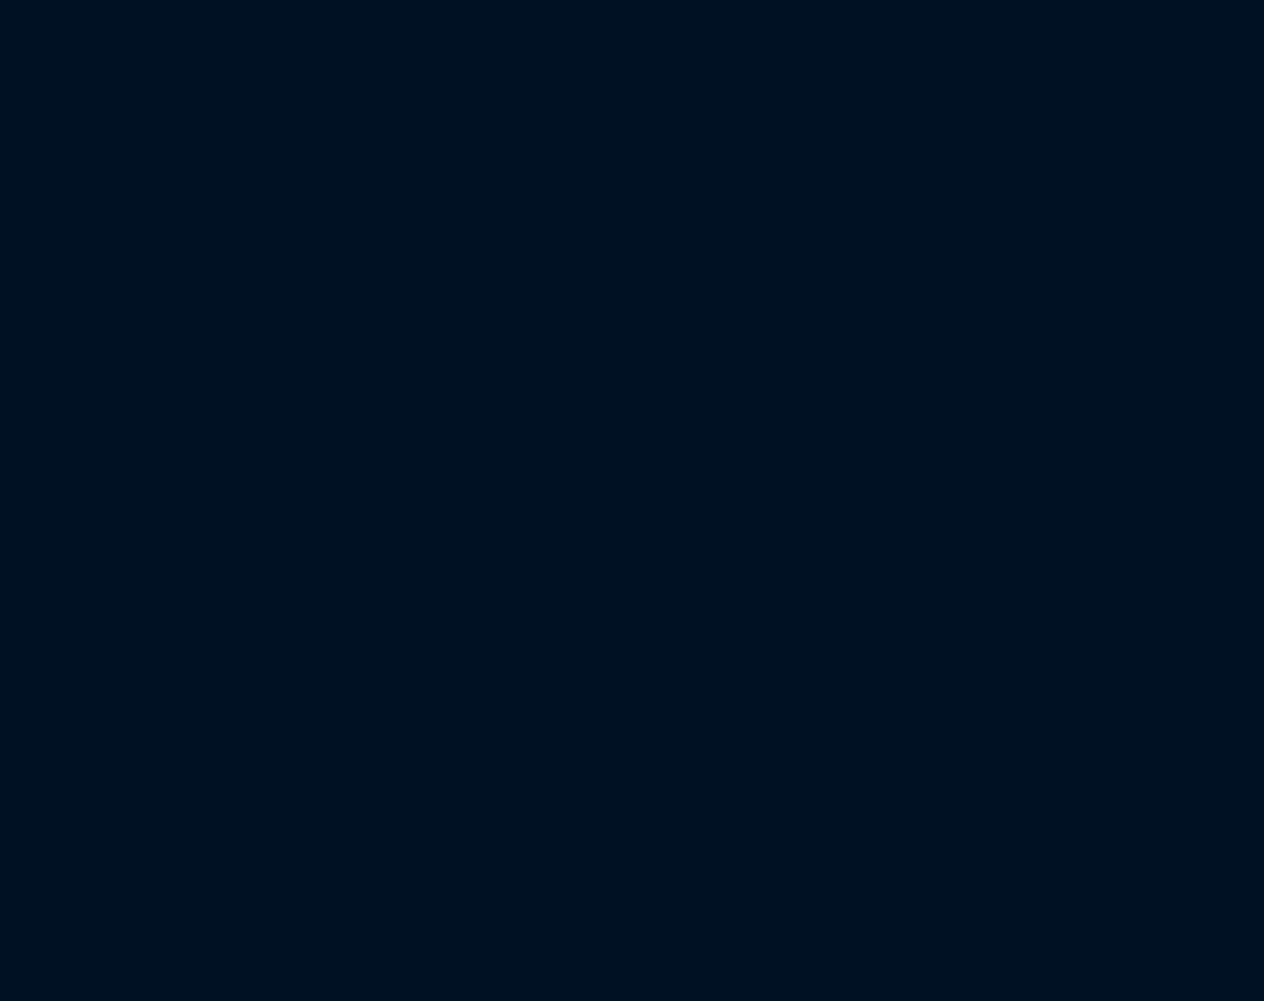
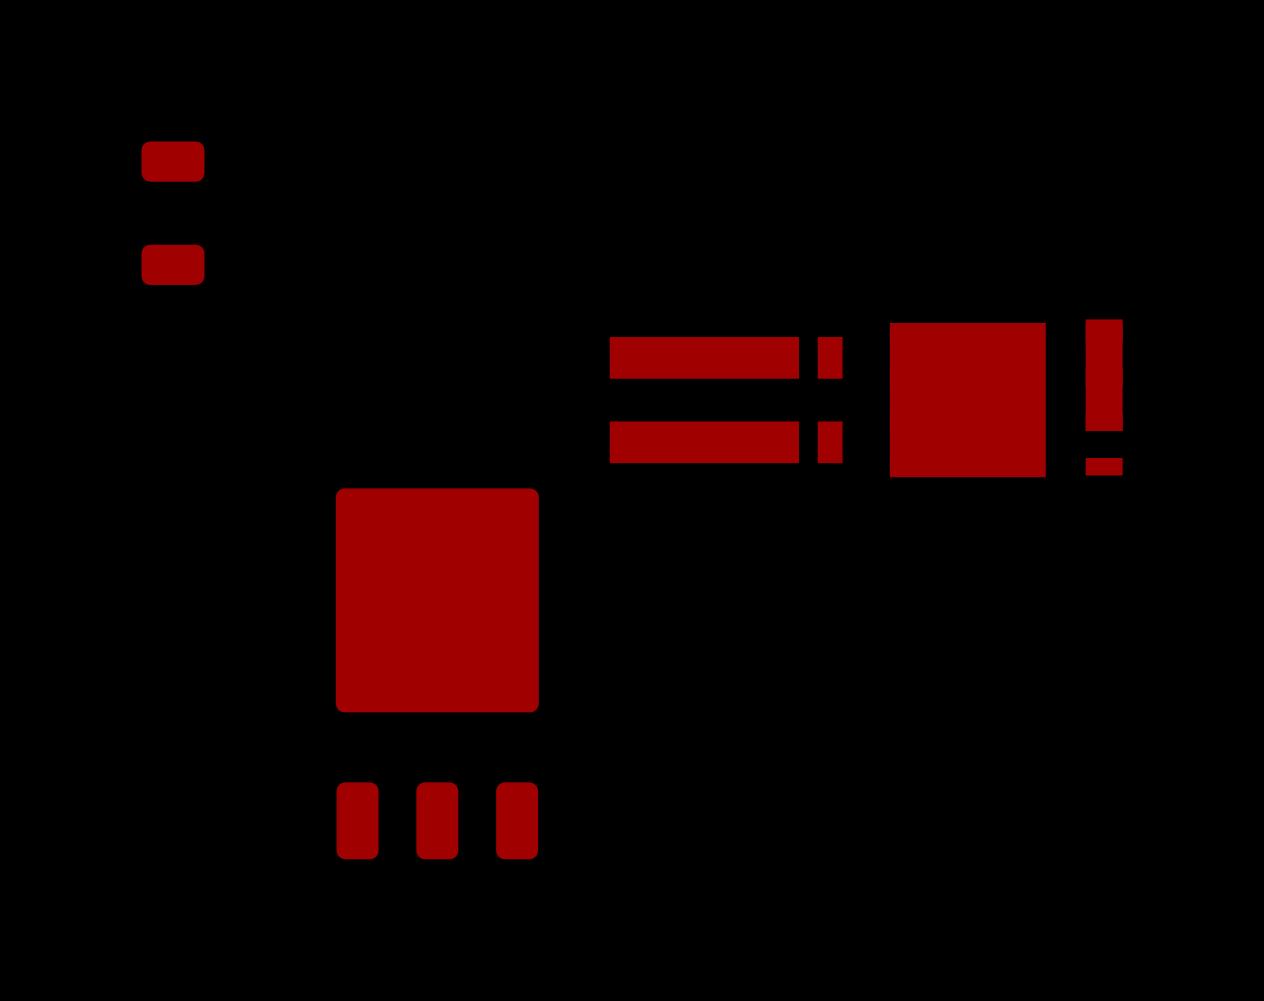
part: none -> (172, 213)
part: none -> (1006, 398)
part: none -> (726, 400)
part: none -> (437, 673)

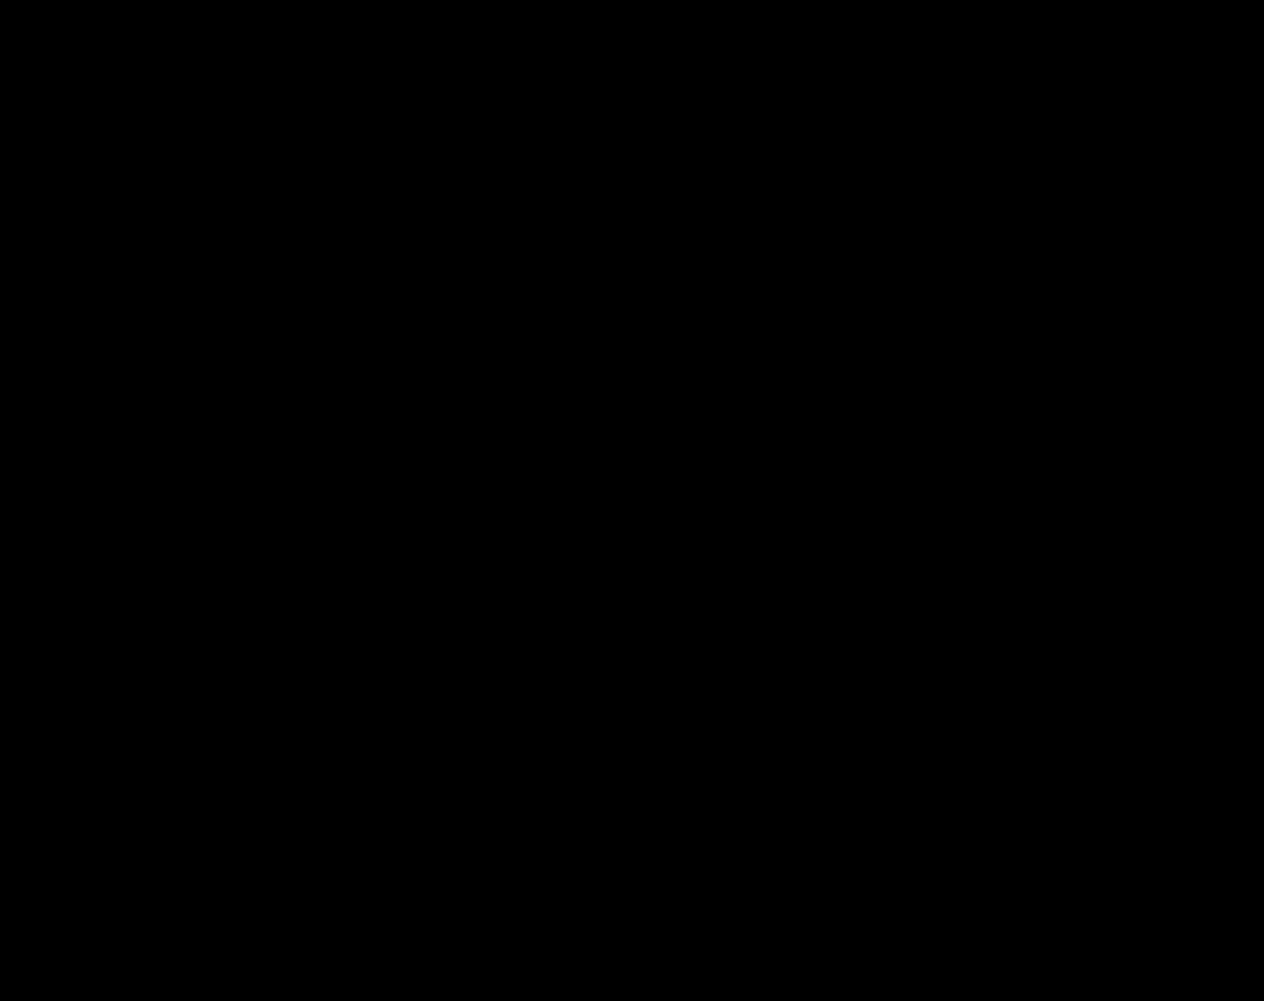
part: (172, 213) -> none
part: (1006, 398) -> none
part: (726, 400) -> none
part: (437, 673) -> none

